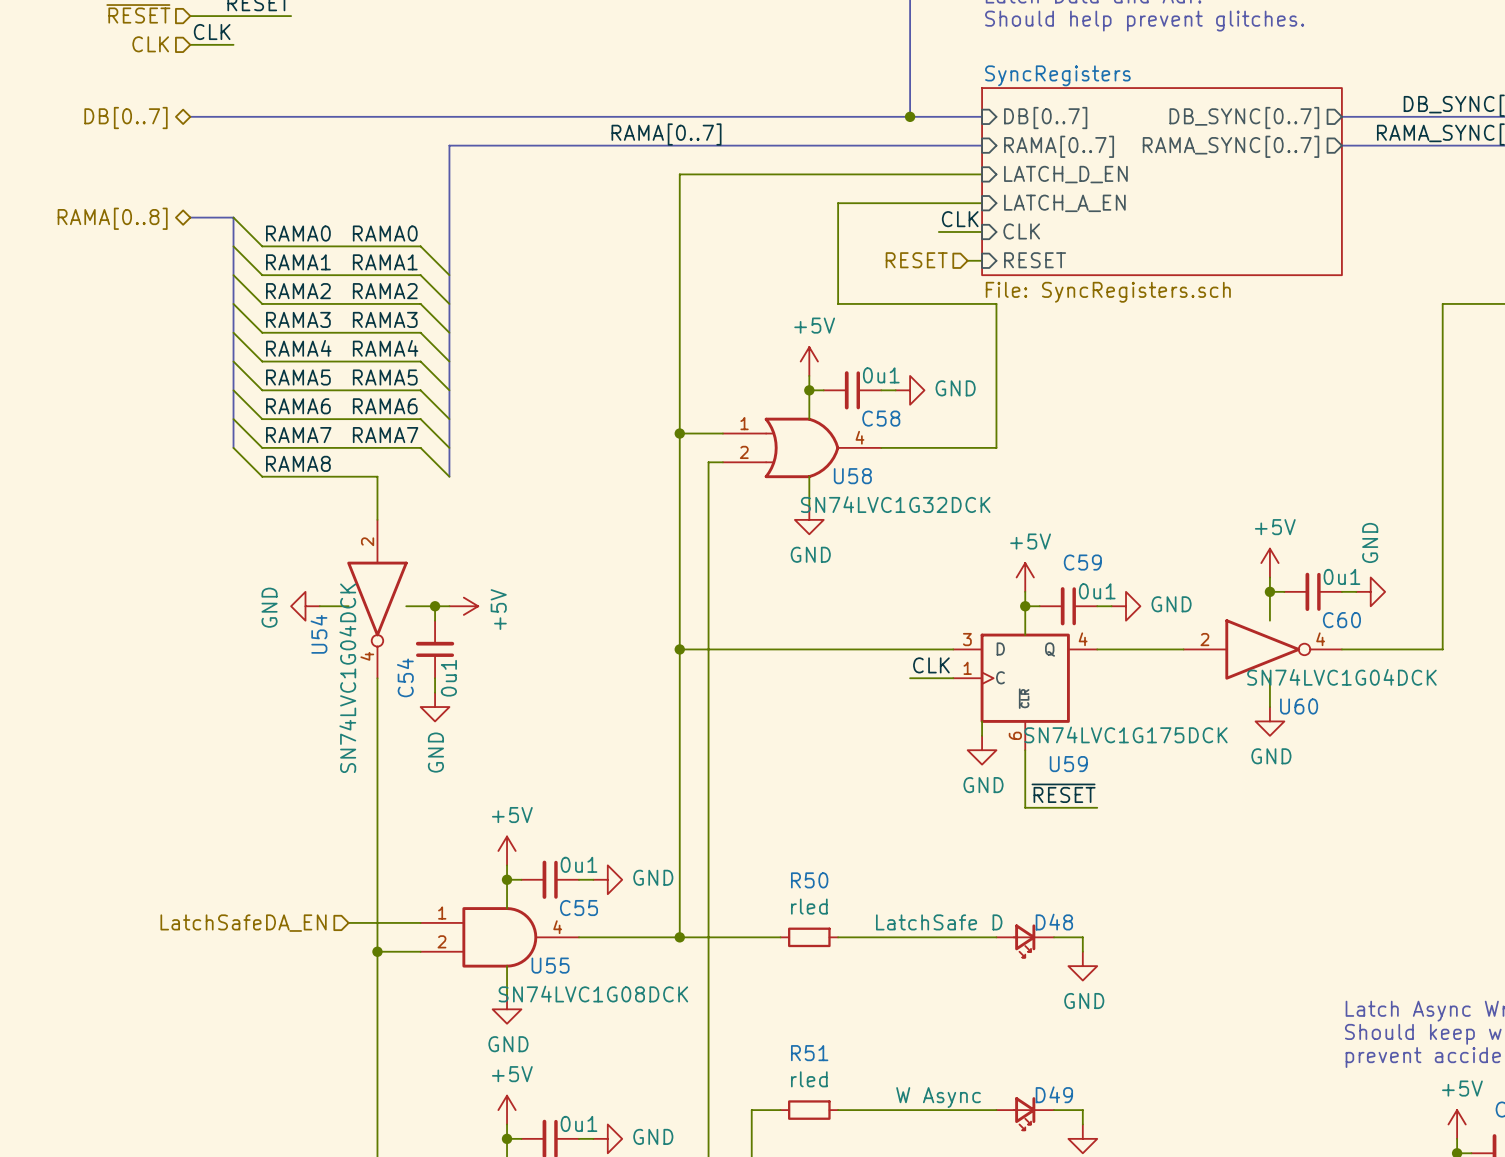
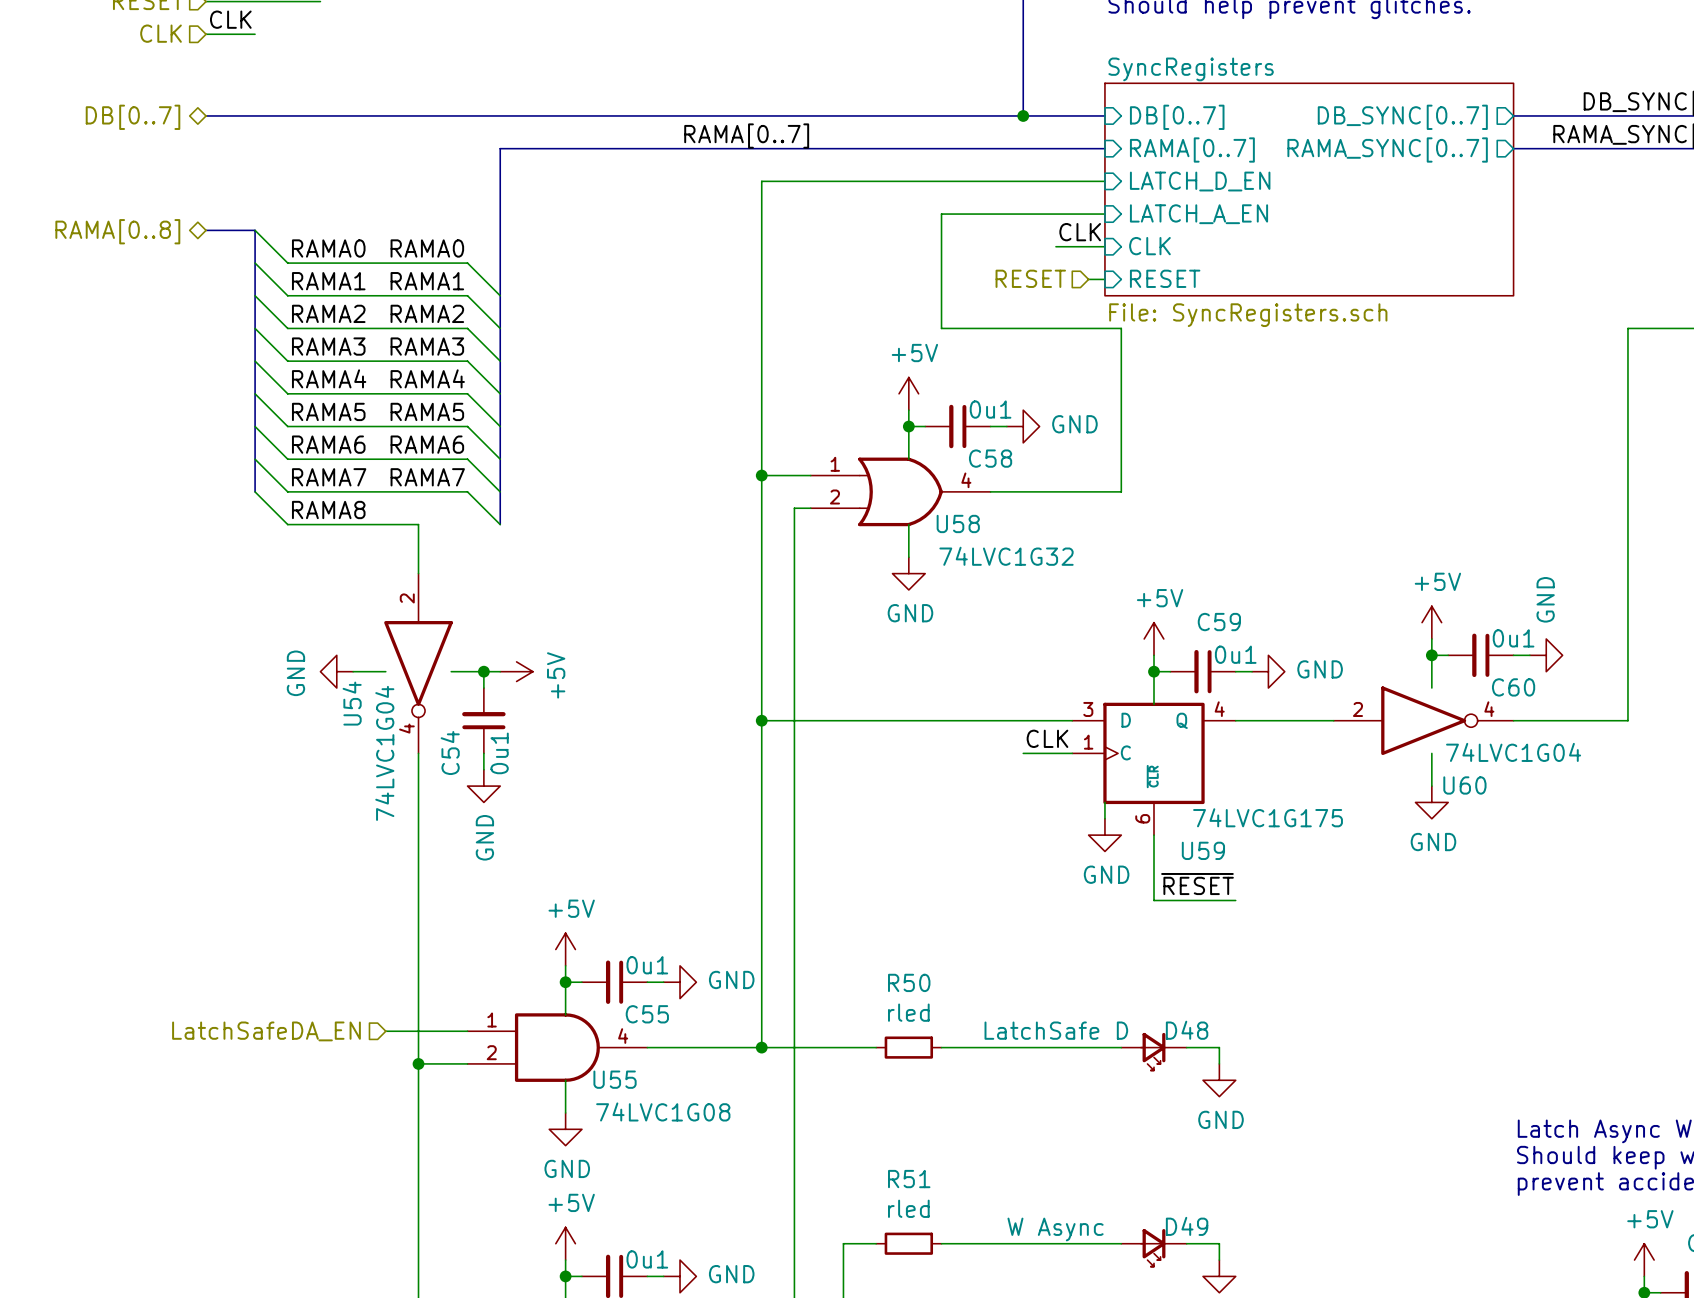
U58 value: SN74LVC1G32DCK (895, 504) -> 74LVC1G32 (1006, 556)
U60 value: SN74LVC1G04DCK (1341, 677) -> 74LVC1G04 (1513, 752)
U54 value: SN74LVC1G04DCK (347, 678) -> 74LVC1G04 (384, 753)
U59 value: SN74LVC1G175DCK (1126, 734) -> 74LVC1G175 (1268, 817)
U55 value: SN74LVC1G08DCK (593, 994) -> 74LVC1G08 (663, 1111)

